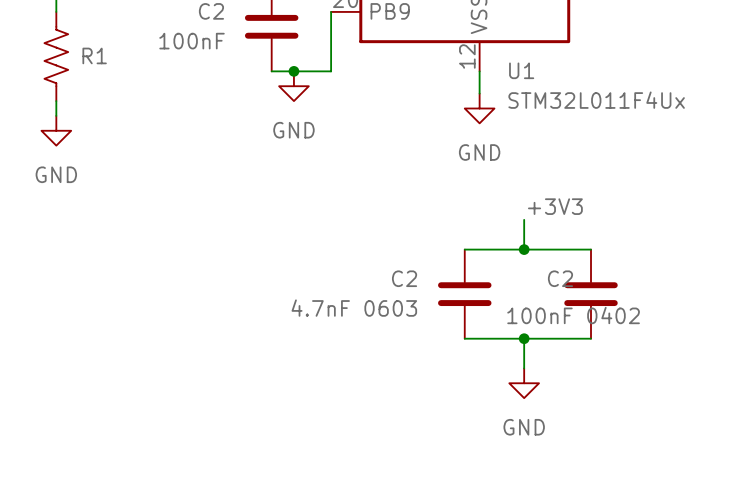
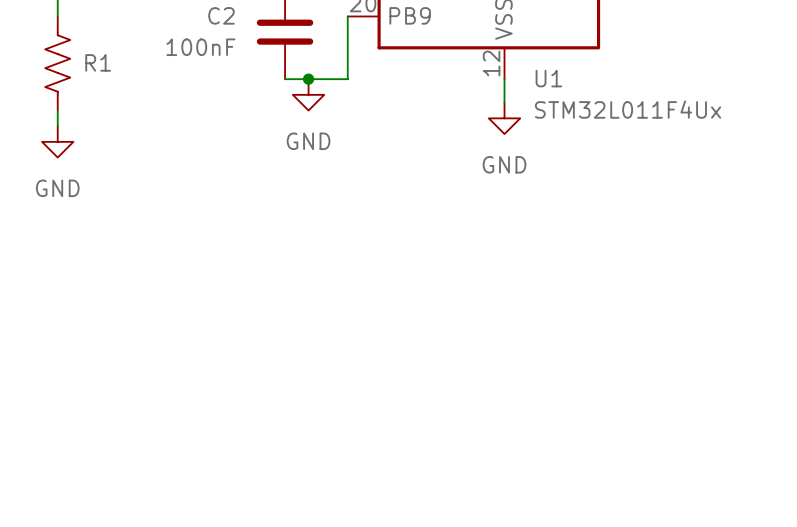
label: +3V3 (555, 206) -> none
wire: (524, 219) (524, 249) -> none
wire: (464, 249) (591, 249) -> none
junction: (524, 249) -> none
C2: 4.7nF 0603 (464, 294) -> none
C2: 100nF 0402 (591, 294) -> none
wire: (464, 338) (591, 338) -> none
wire: (524, 338) (524, 368) -> none
junction: (524, 338) -> none
power symbol: GND (524, 383) -> none

